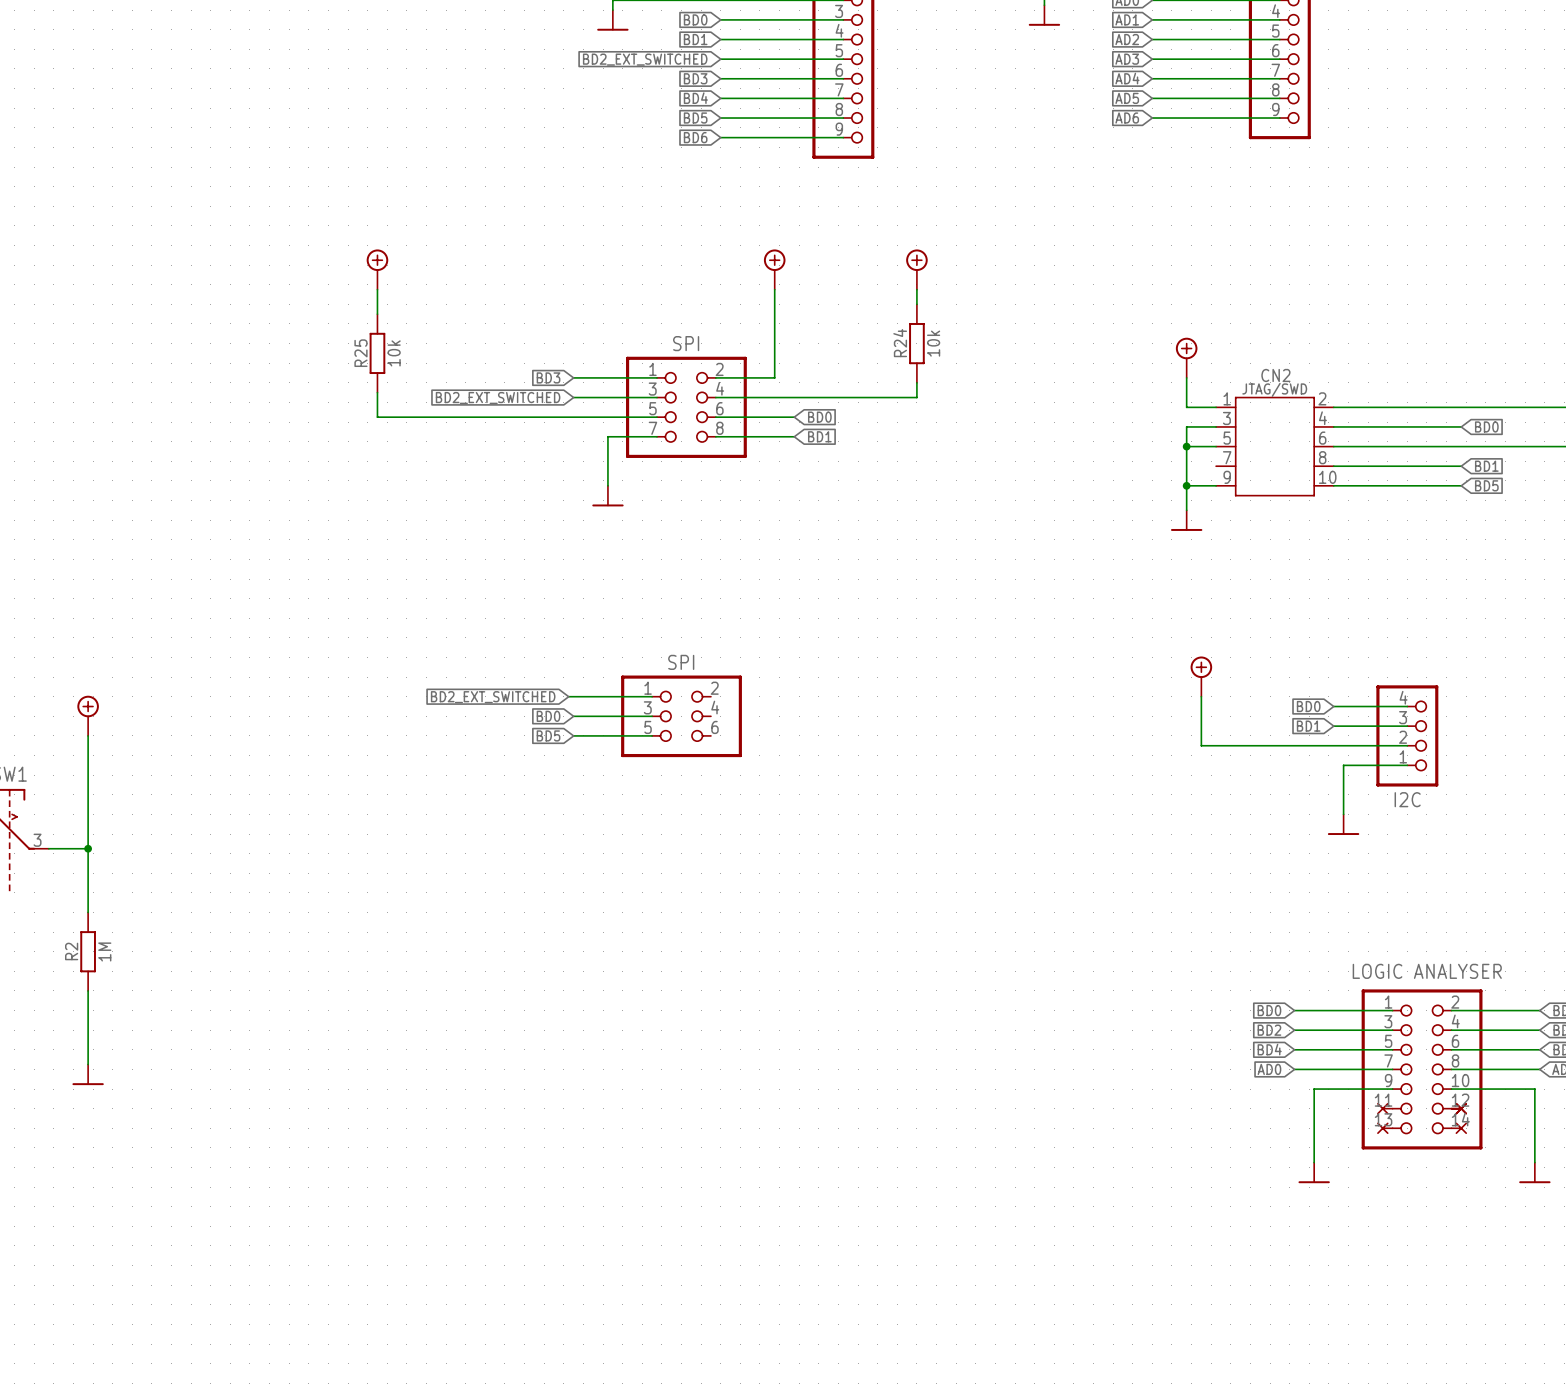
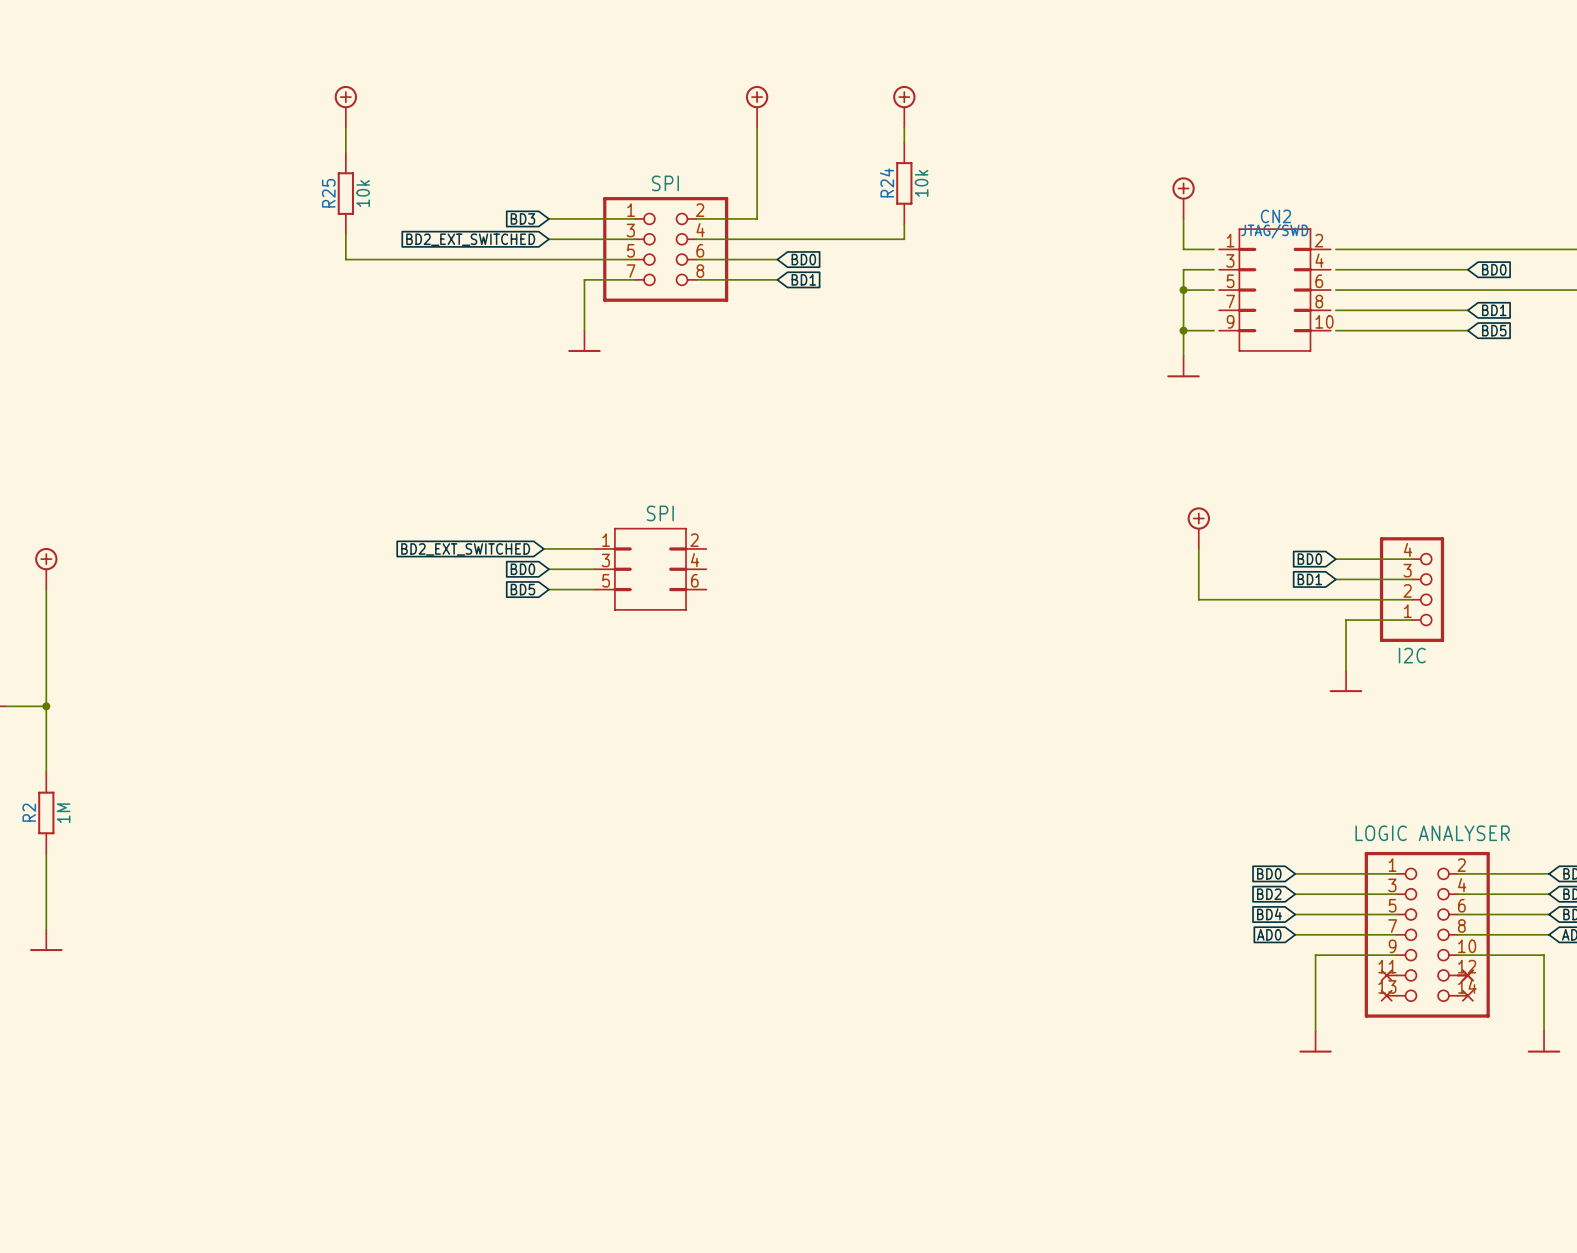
CN2 symbol: [1216, 396, 1334, 497] -> [1219, 228, 1331, 352]
part: none -> SPI (650, 569)
part: SPI (681, 716) -> none

